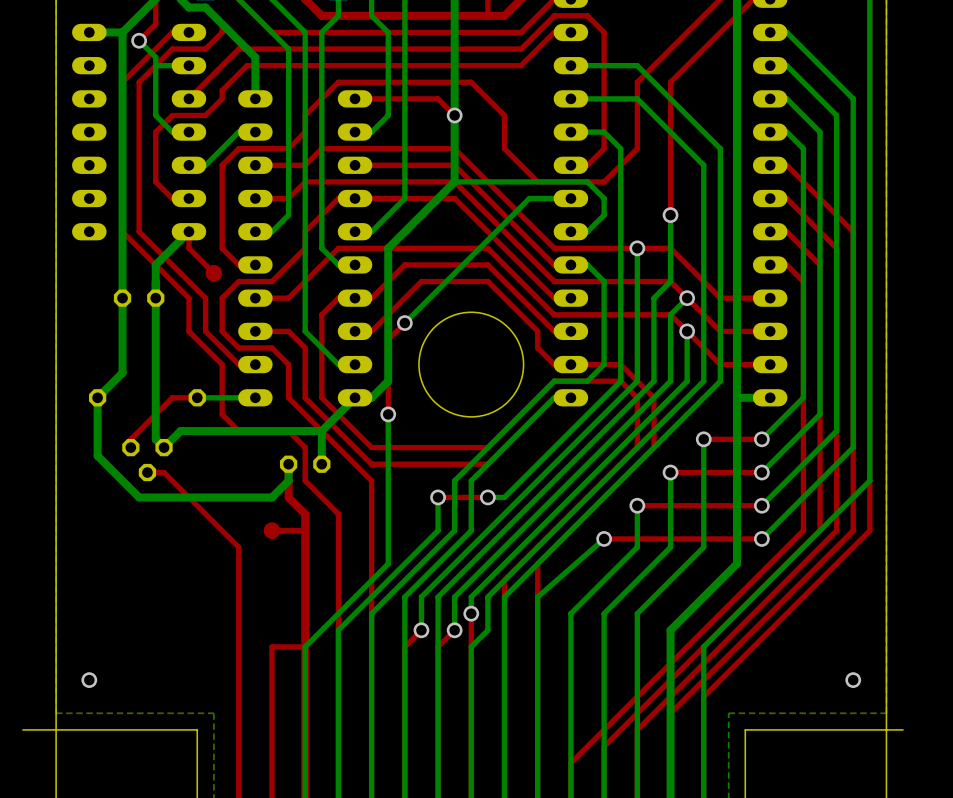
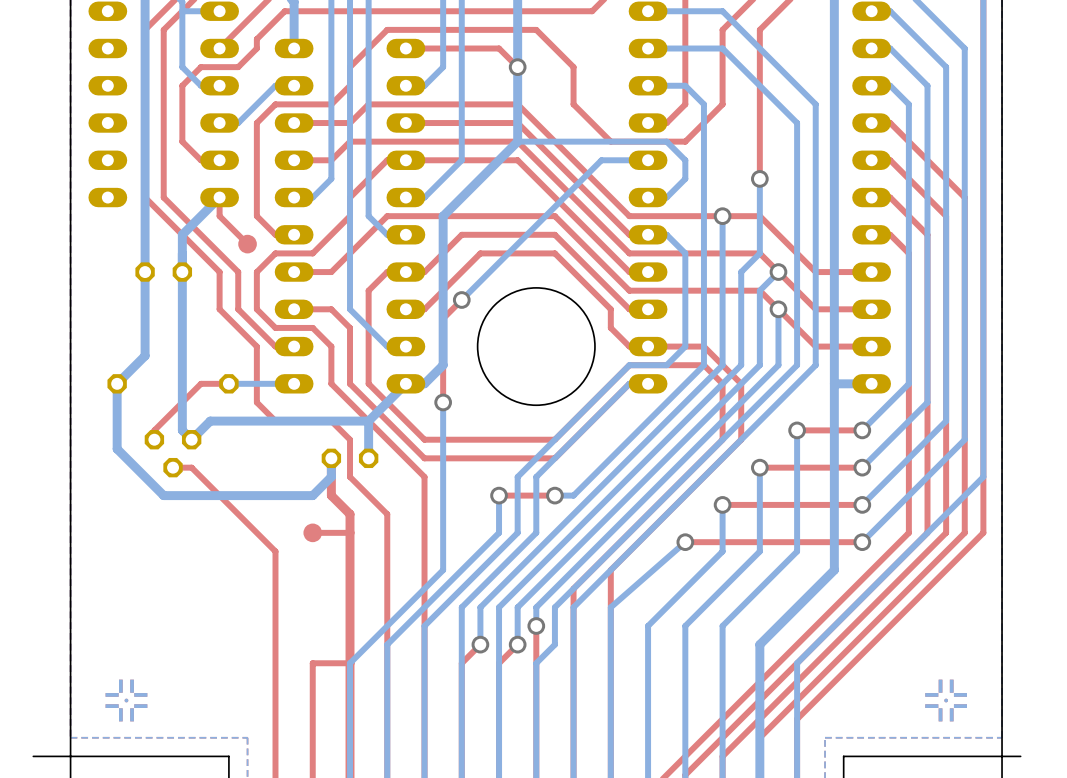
drawing: none -> [105, 679, 148, 722]
drawing: none -> [925, 679, 968, 722]
via: (89, 680) -> none
via: (853, 680) -> none

